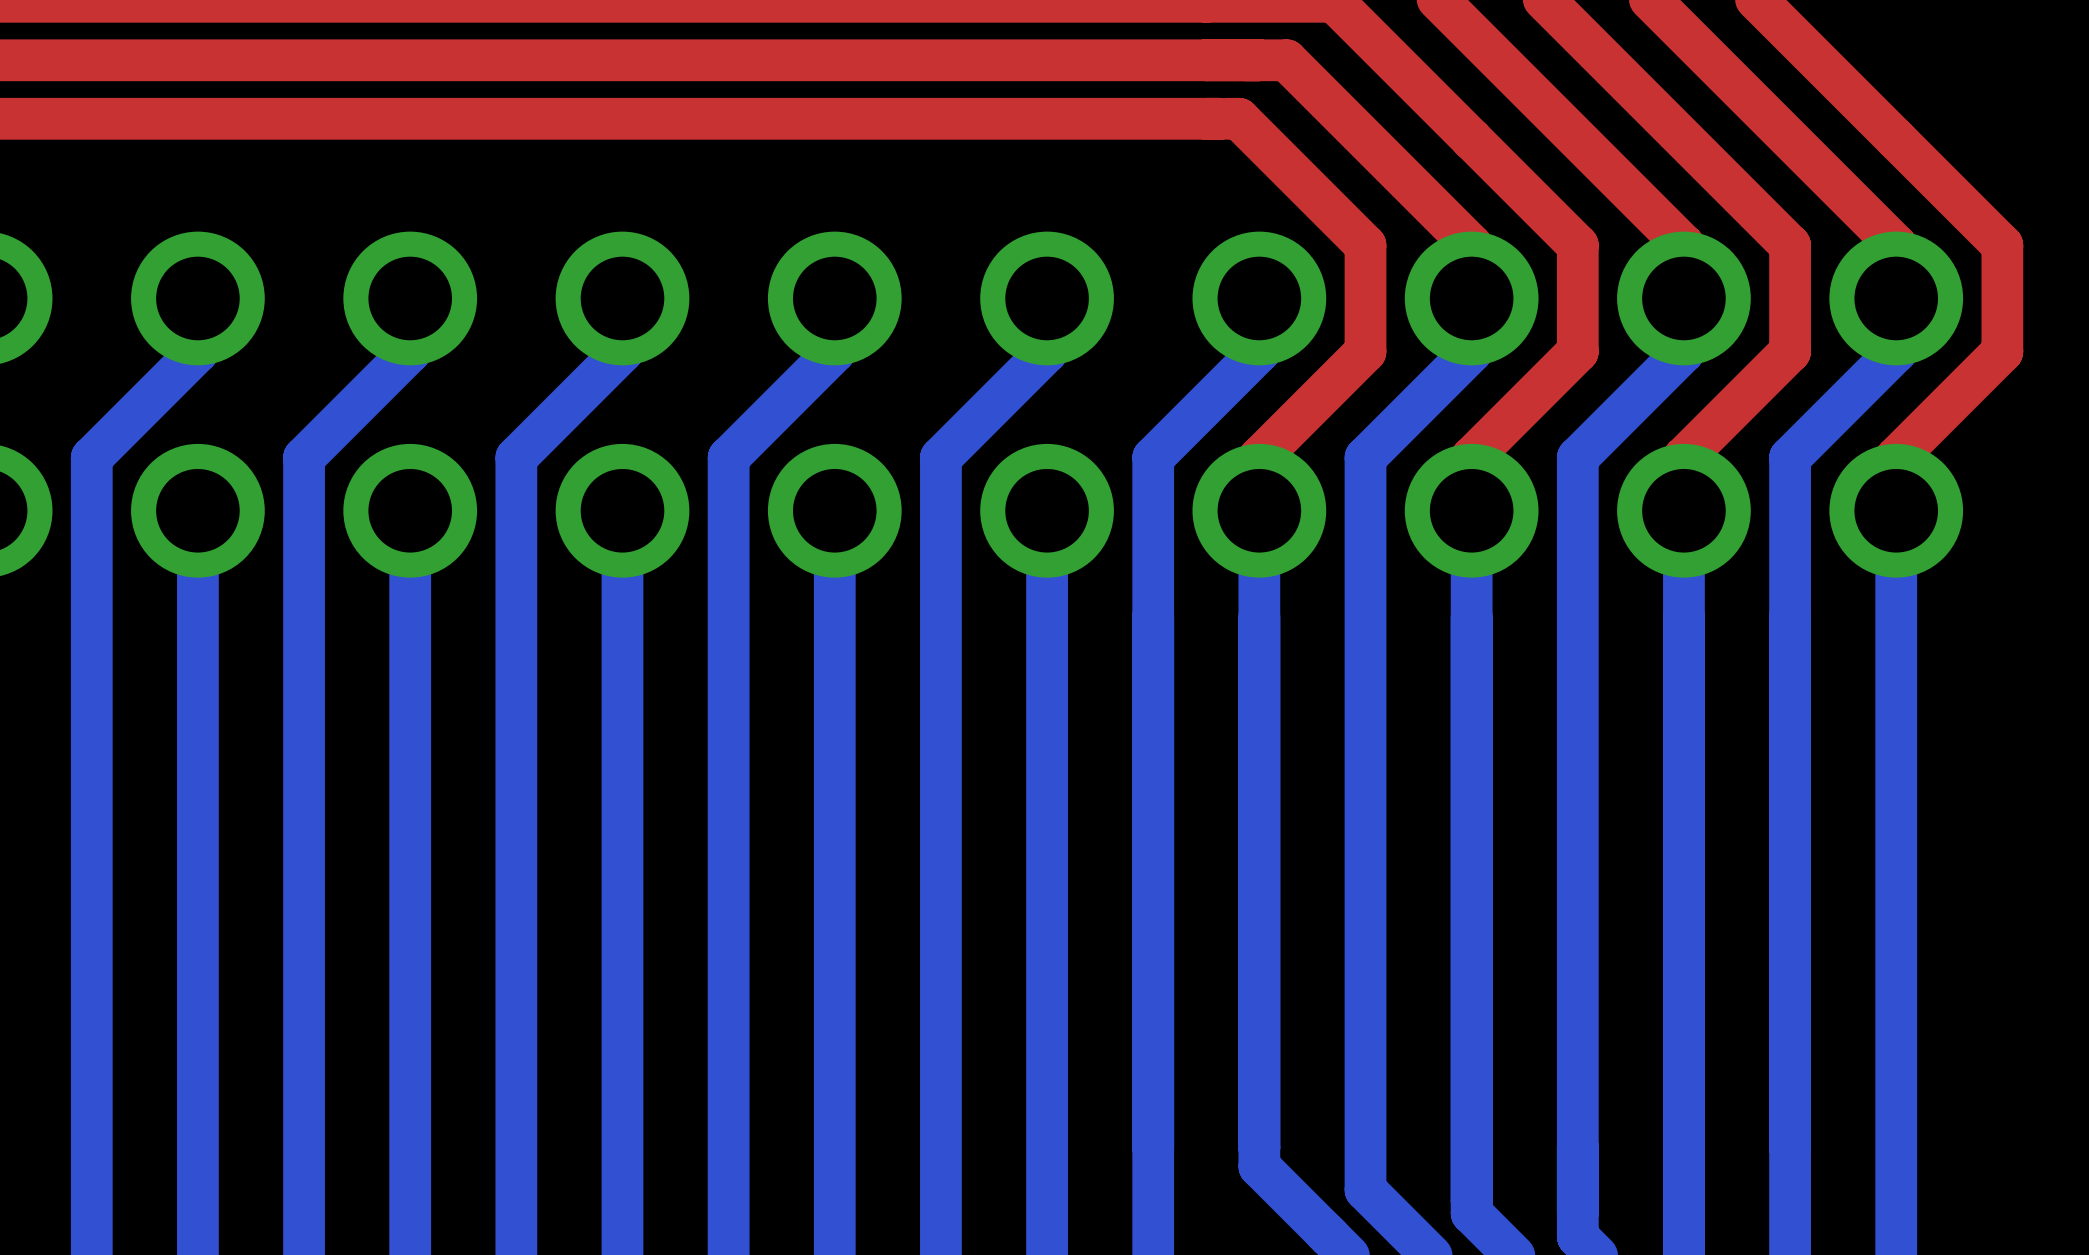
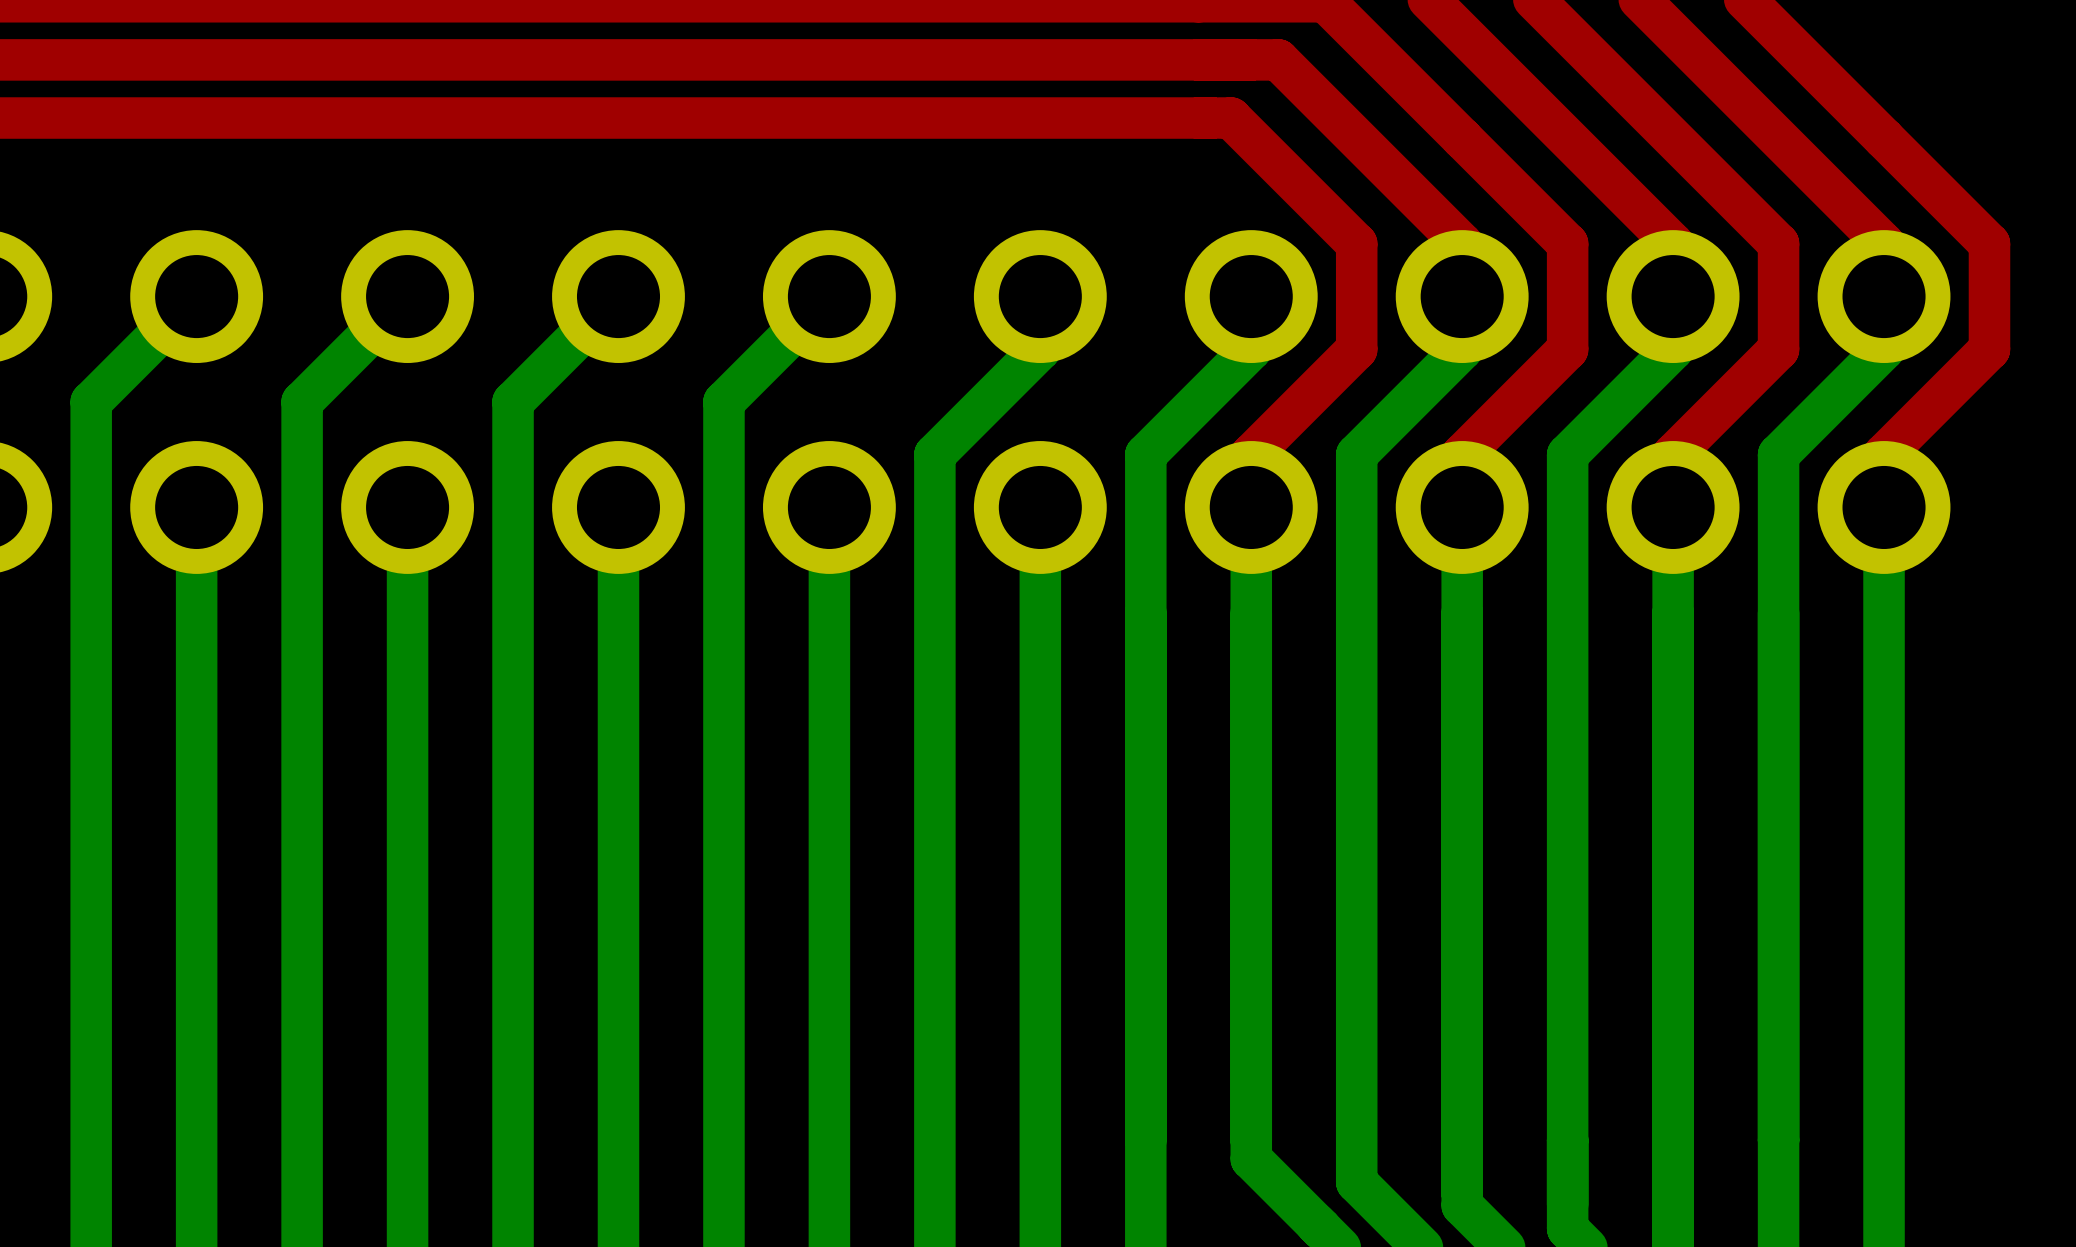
bottom track: (197, 298) (197, 351) (91, 457) -> (196, 296) (91, 402) (91, 454)
bottom track: (410, 298) (410, 351) (304, 457) -> (407, 296) (302, 402) (302, 454)
bottom track: (622, 298) (622, 351) (516, 457) -> (618, 296) (513, 402) (513, 454)
bottom track: (834, 298) (834, 351) (728, 457) -> (829, 296) (723, 402) (723, 454)

